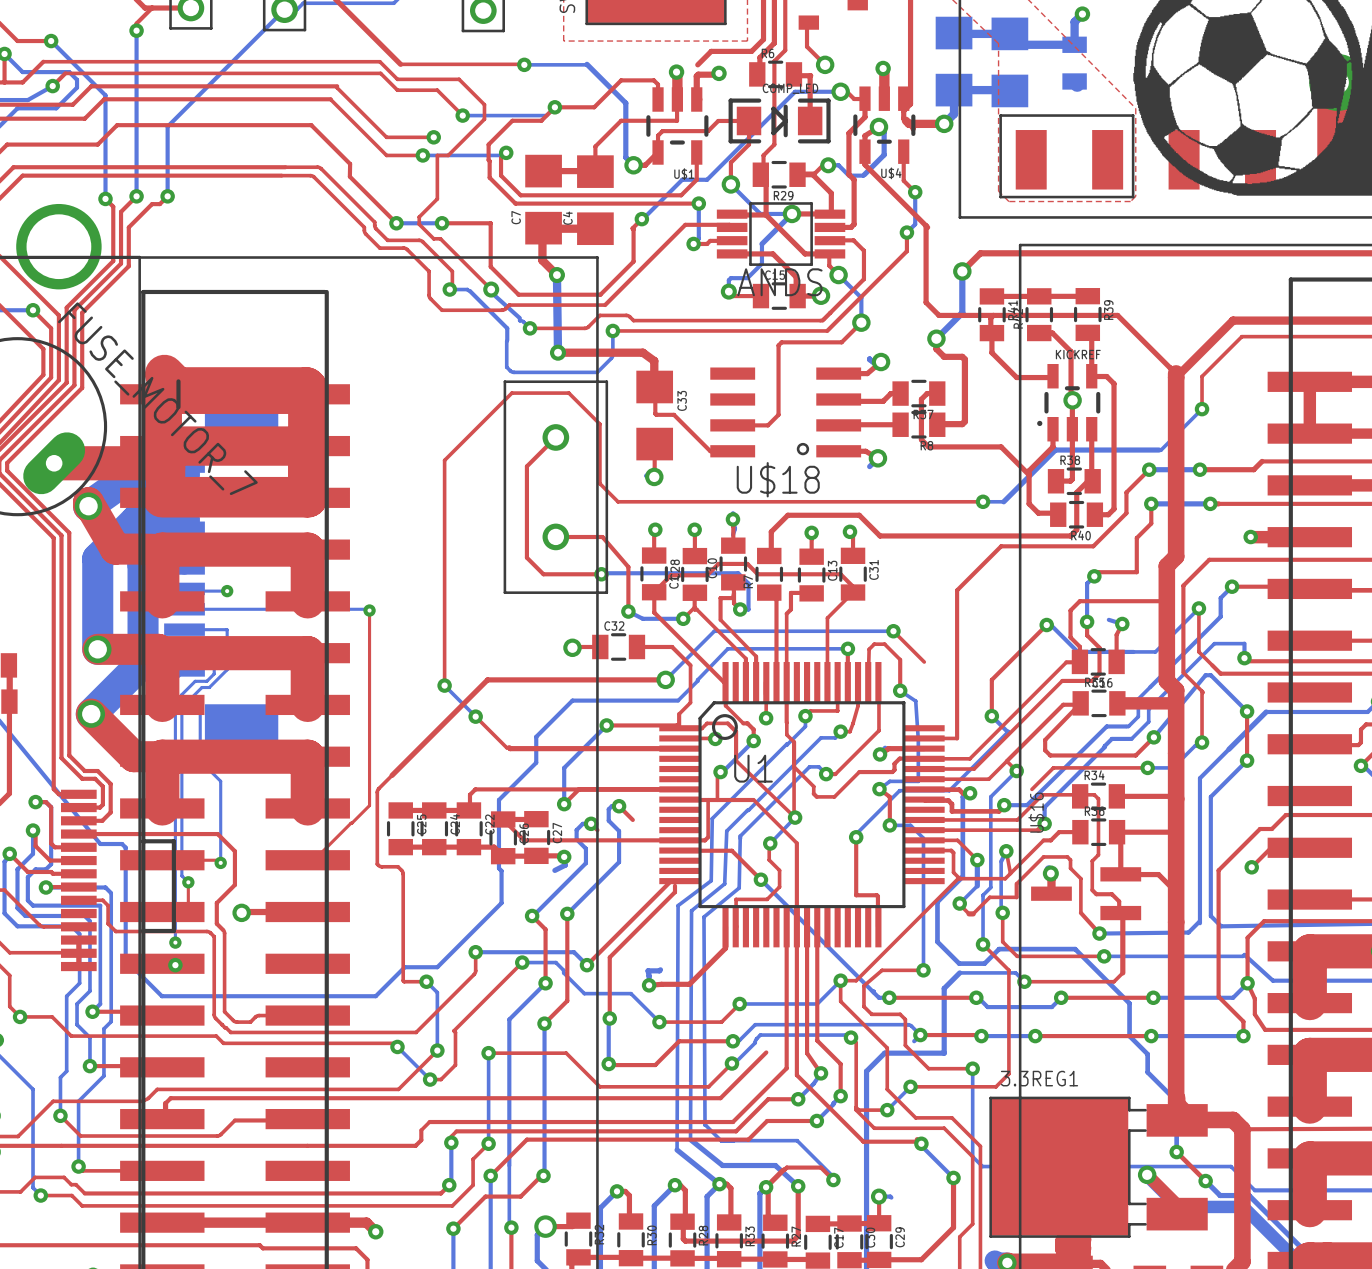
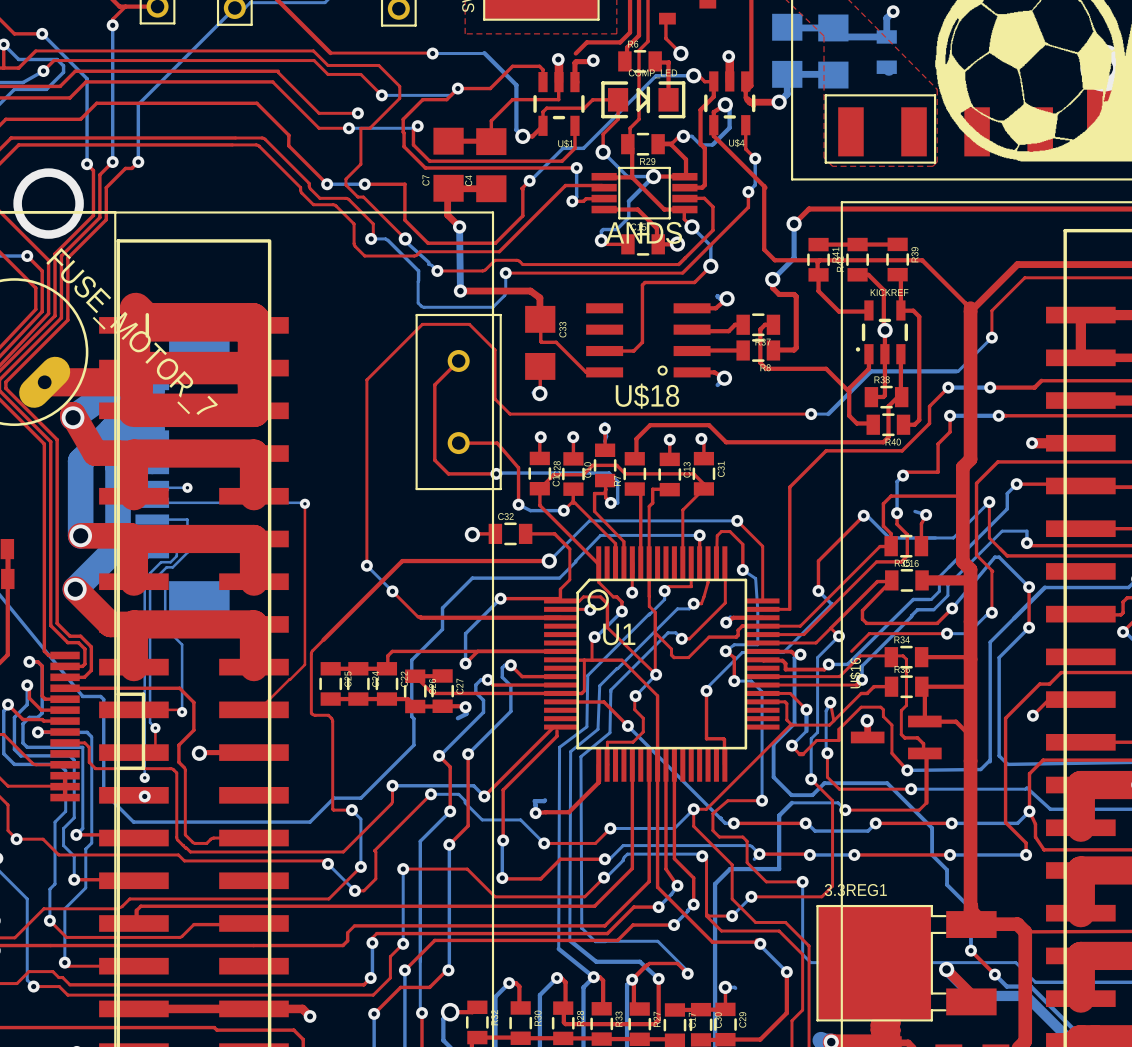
top track: none -> (762, 546) (762, 600)
top track: none -> (522, 676) (560, 676)
top track: none -> (493, 685) (560, 685)
top track: none -> (632, 764) (632, 868)

